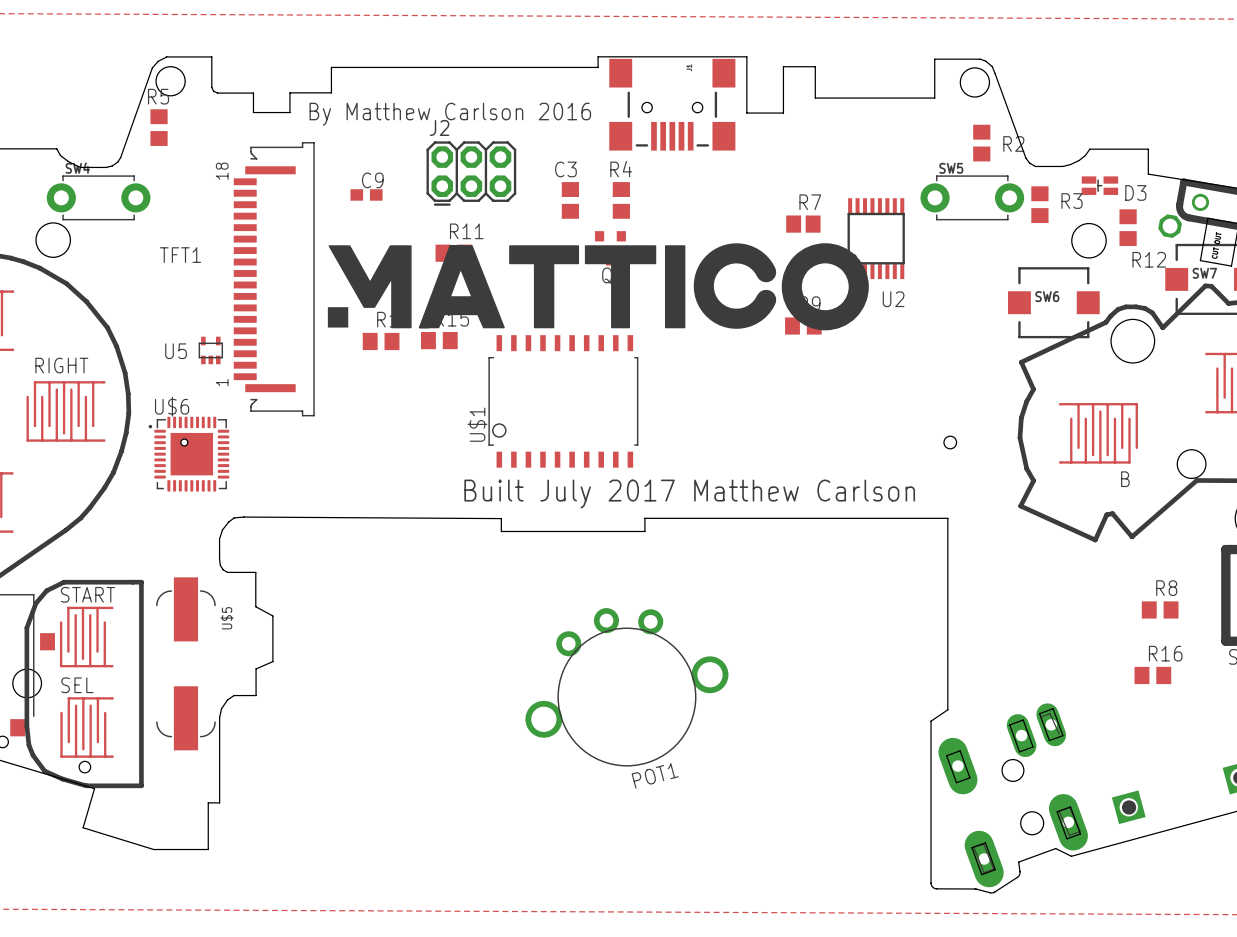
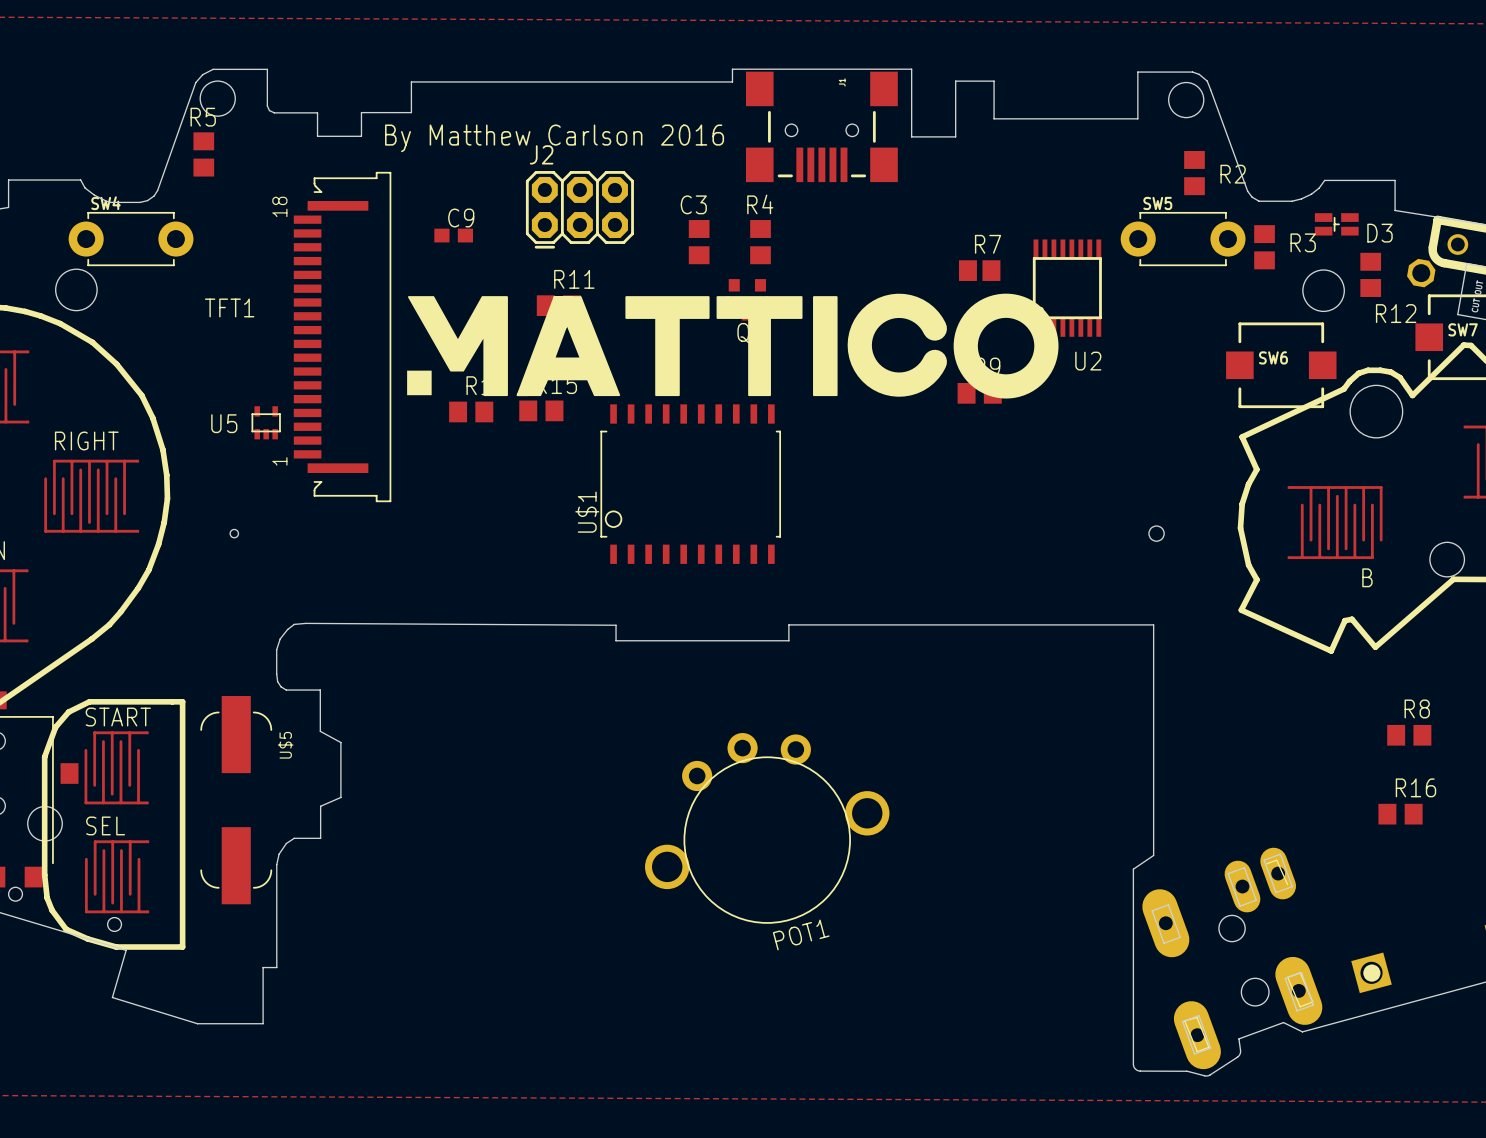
U$6: (188, 454) -> none
text: Built July 2017 Matthew Carlson (689, 493) -> none

